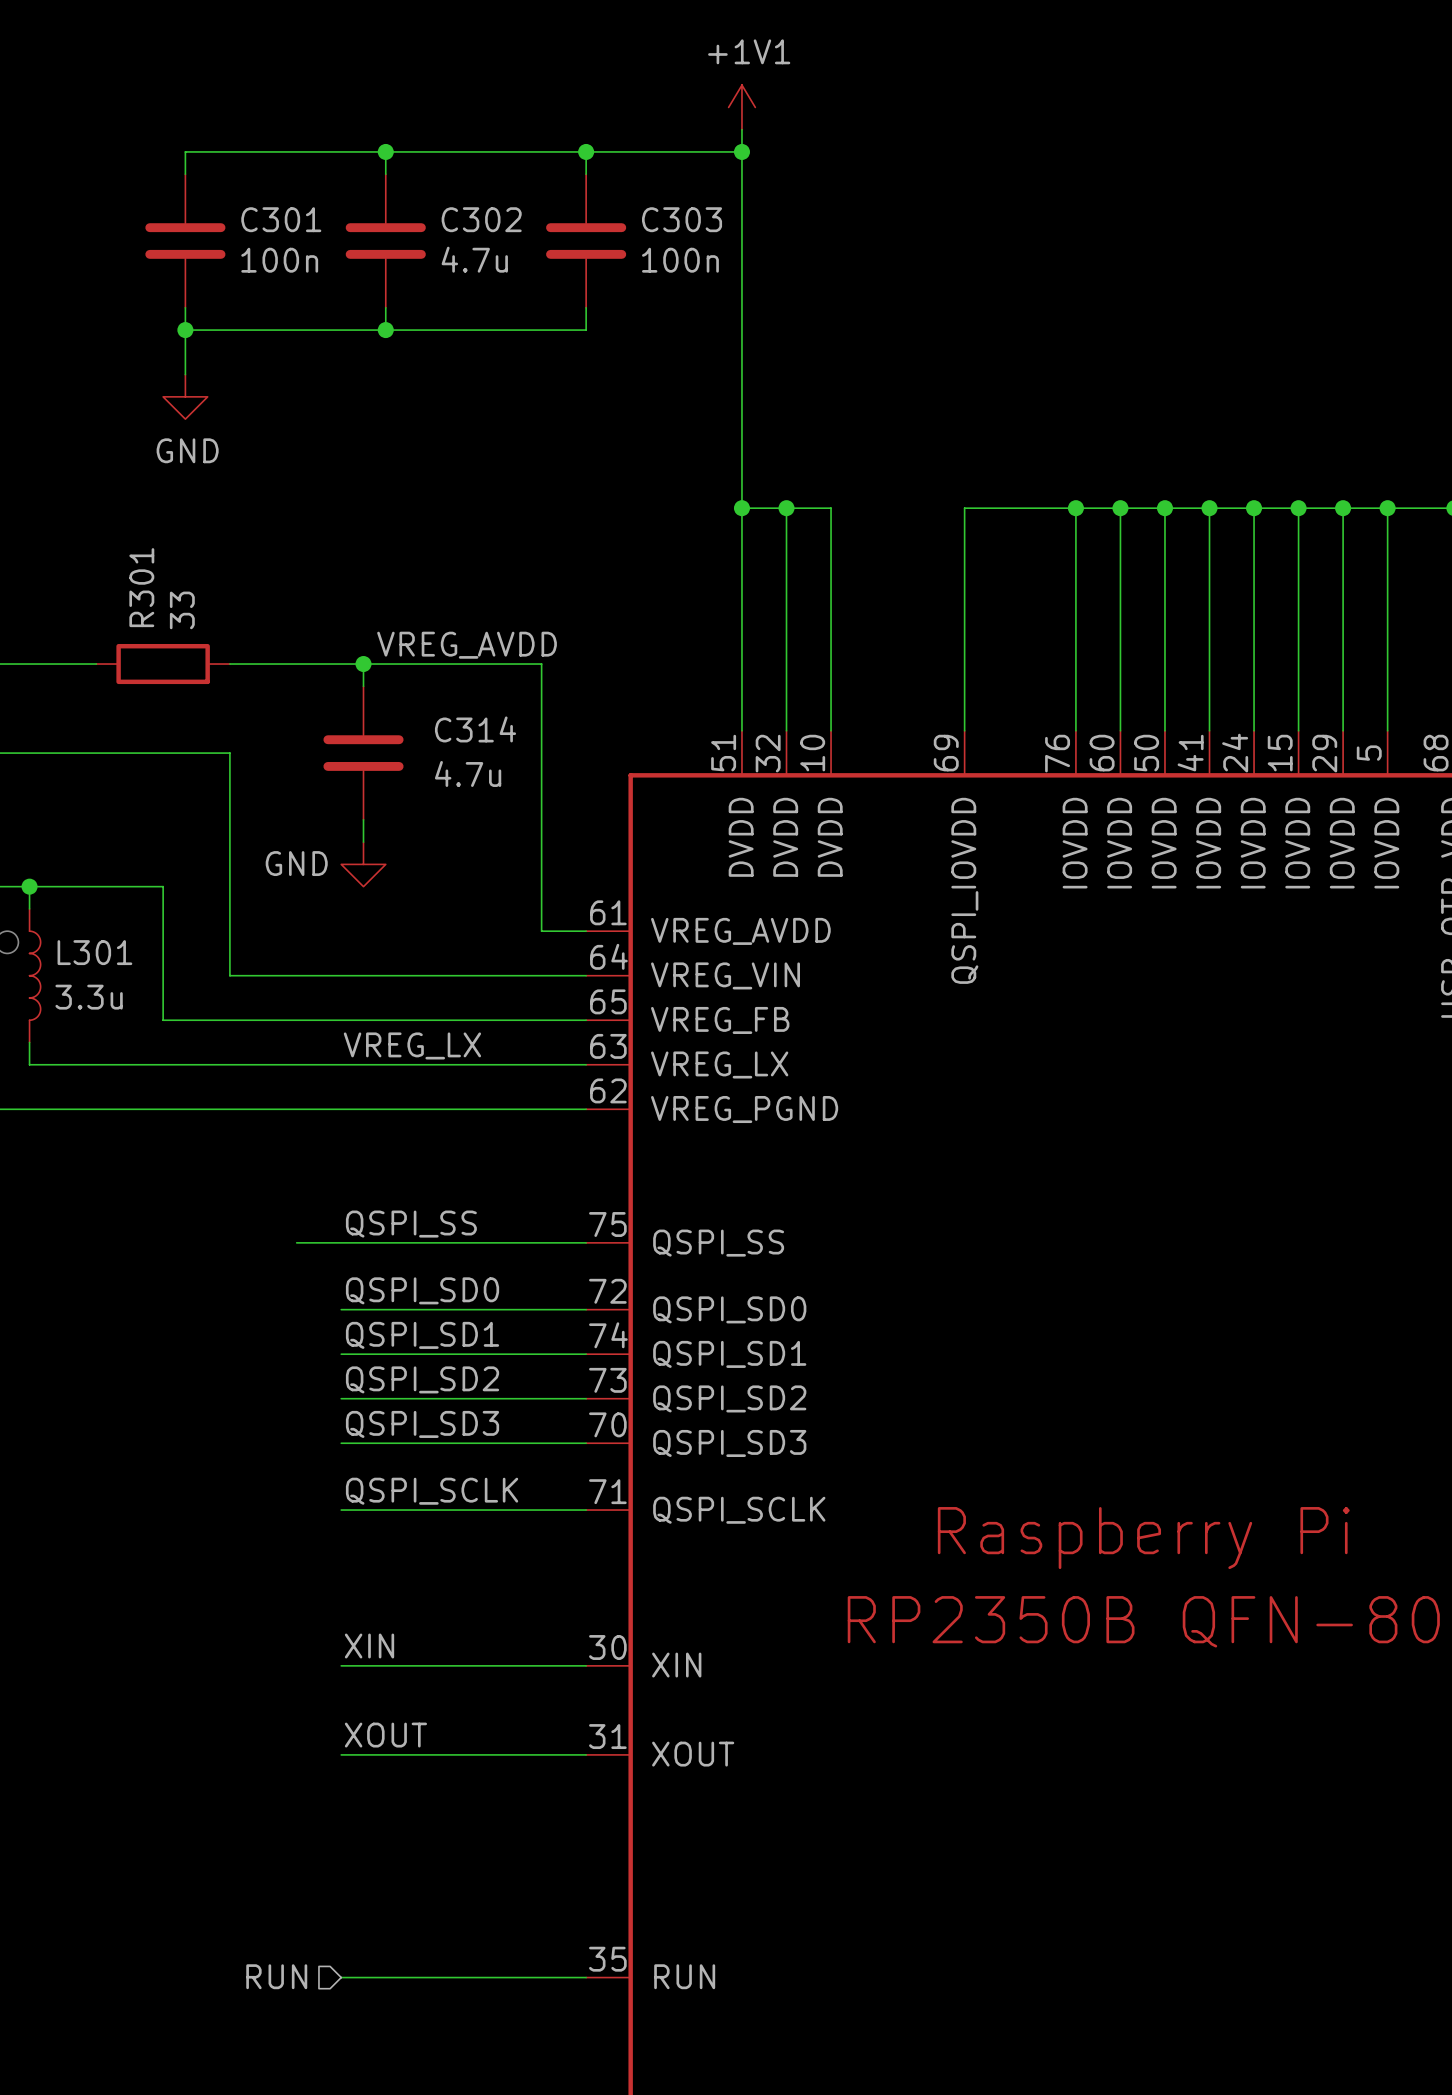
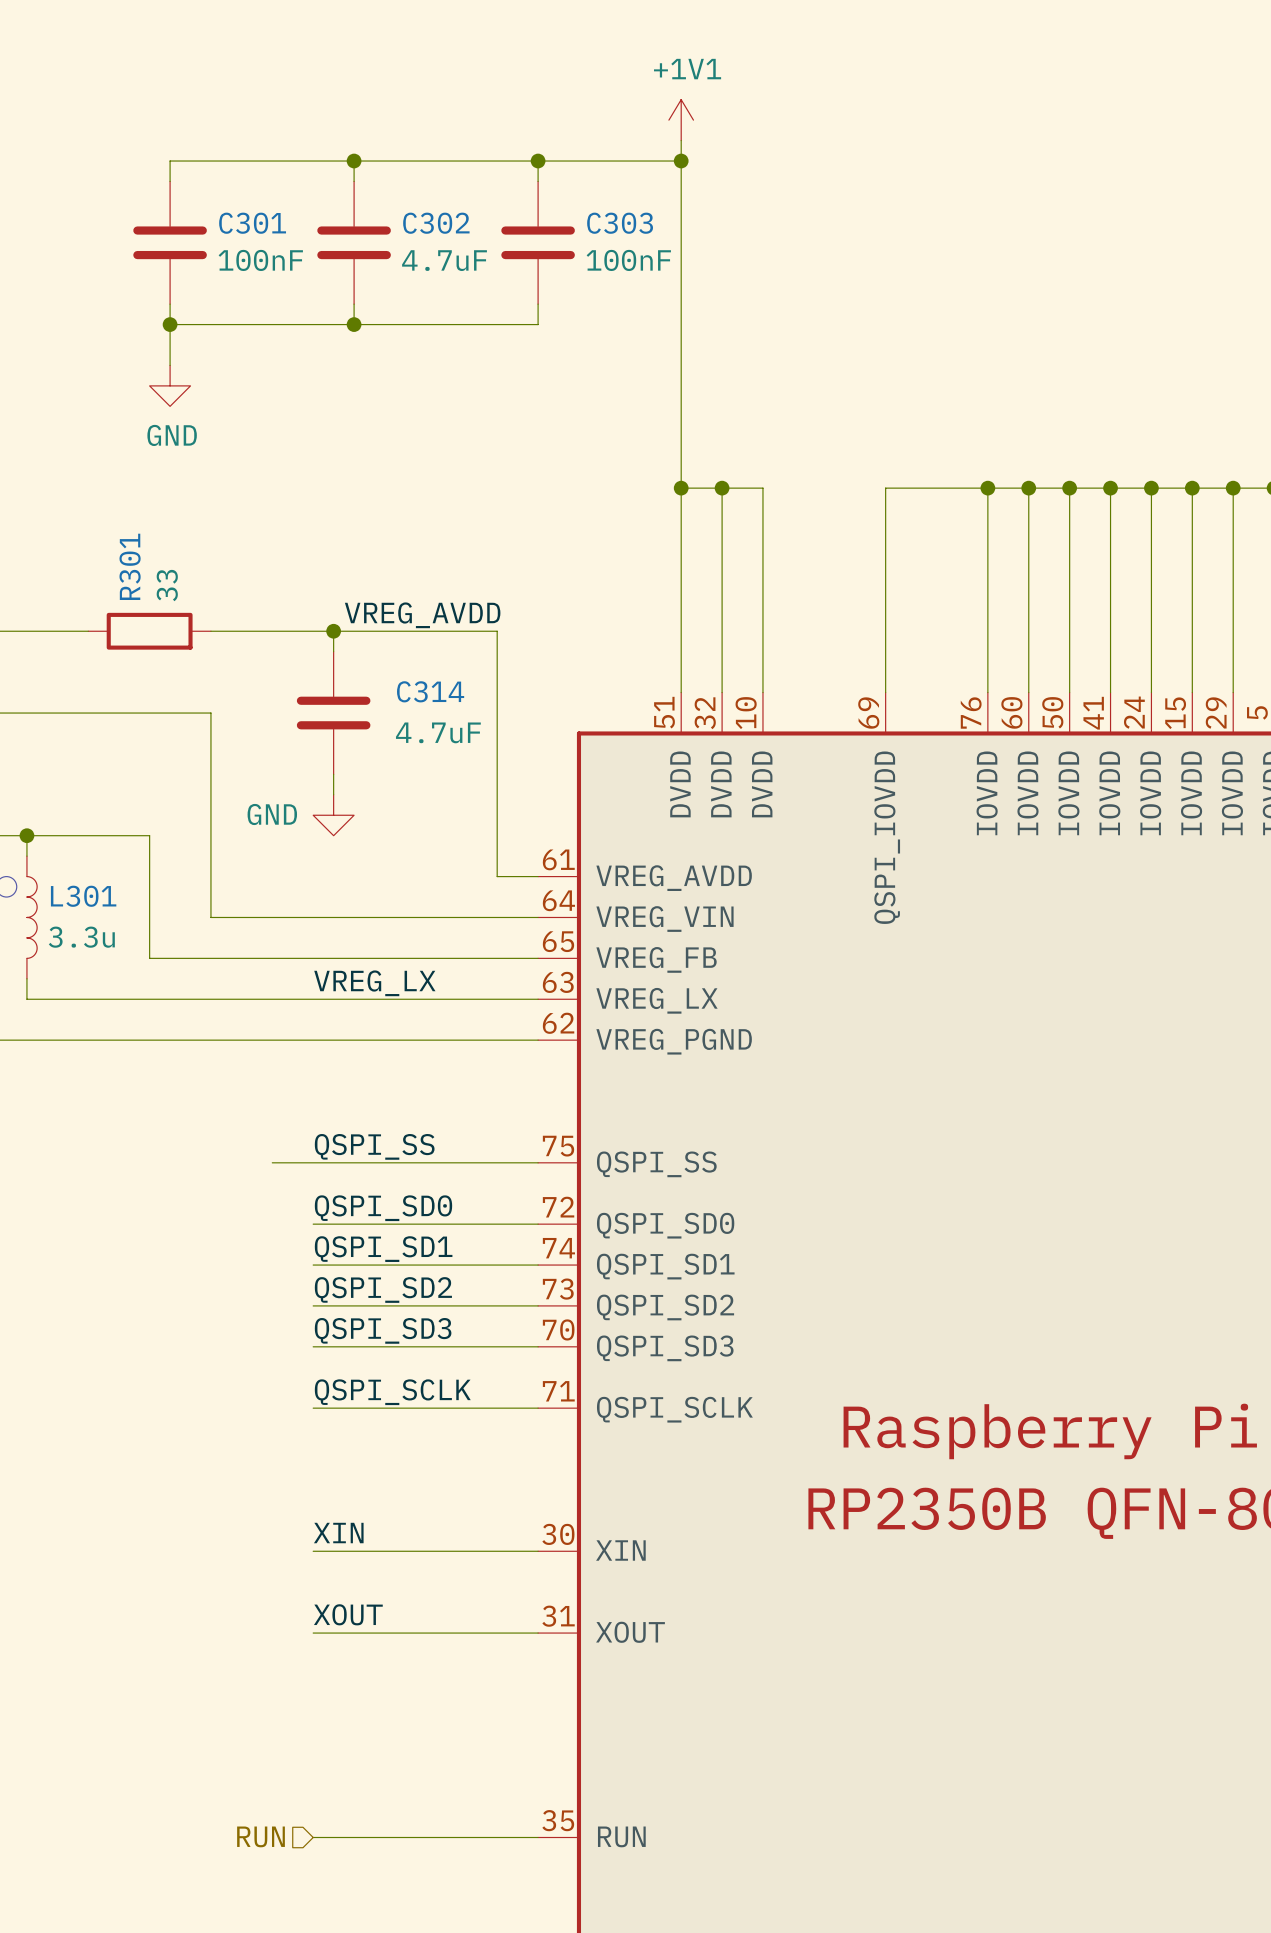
C302 value: 4.7u (474, 259) -> 4.7uF (444, 260)
C301 value: 100n (279, 260) -> 100nF (260, 260)
C303 value: 100n (680, 260) -> 100nF (628, 260)
C314 value: 4.7u (468, 773) -> 4.7uF (438, 732)

